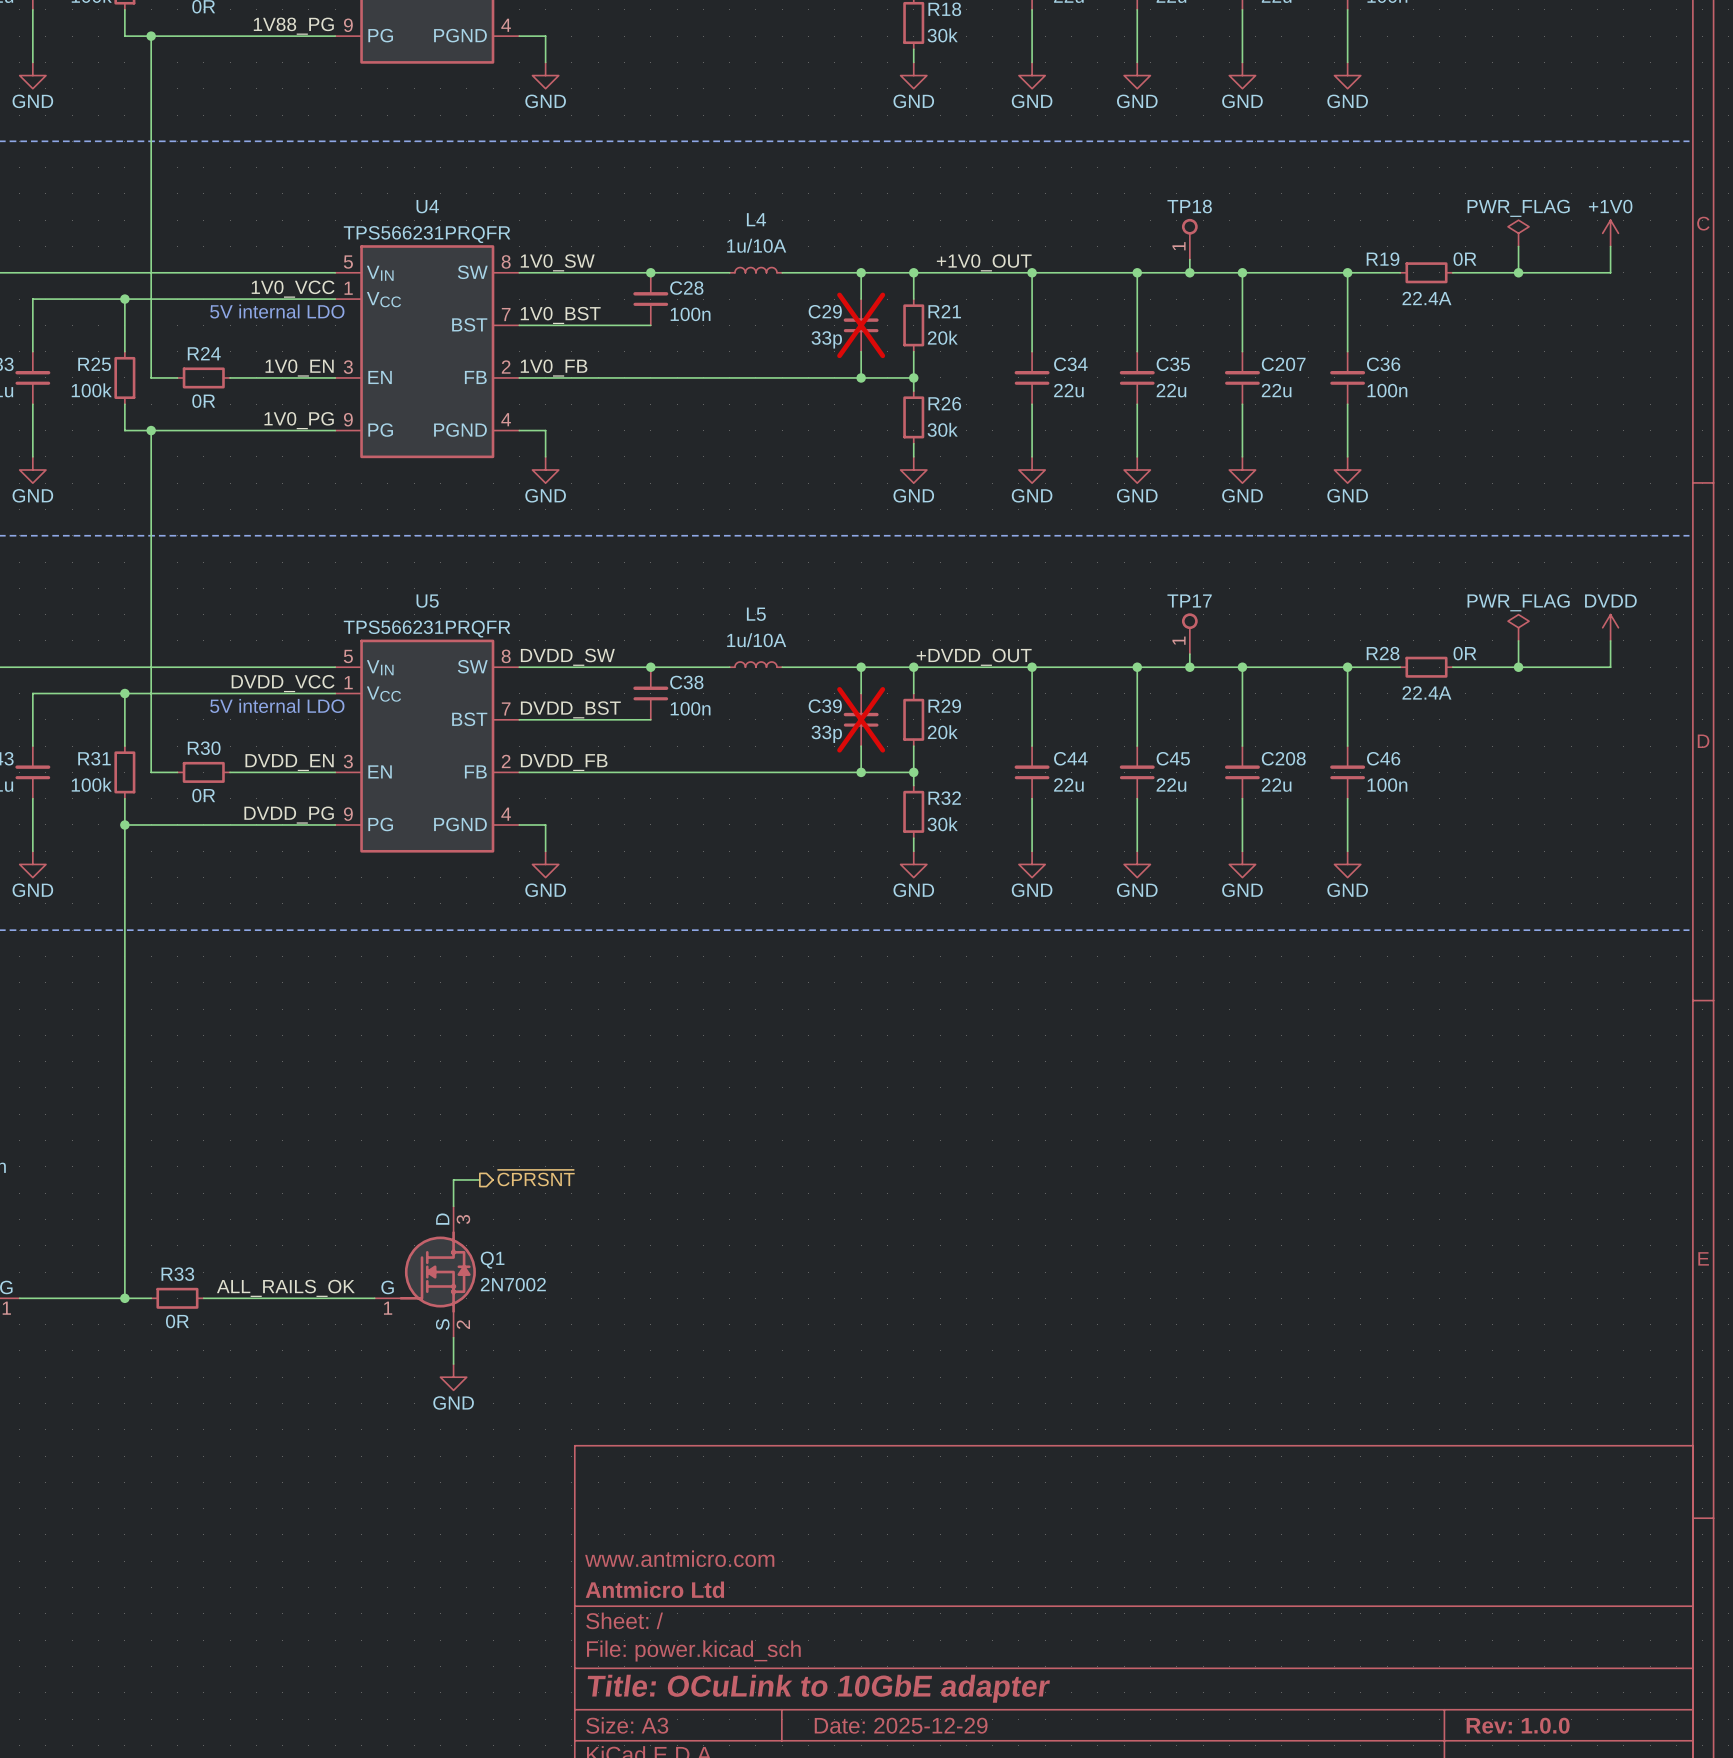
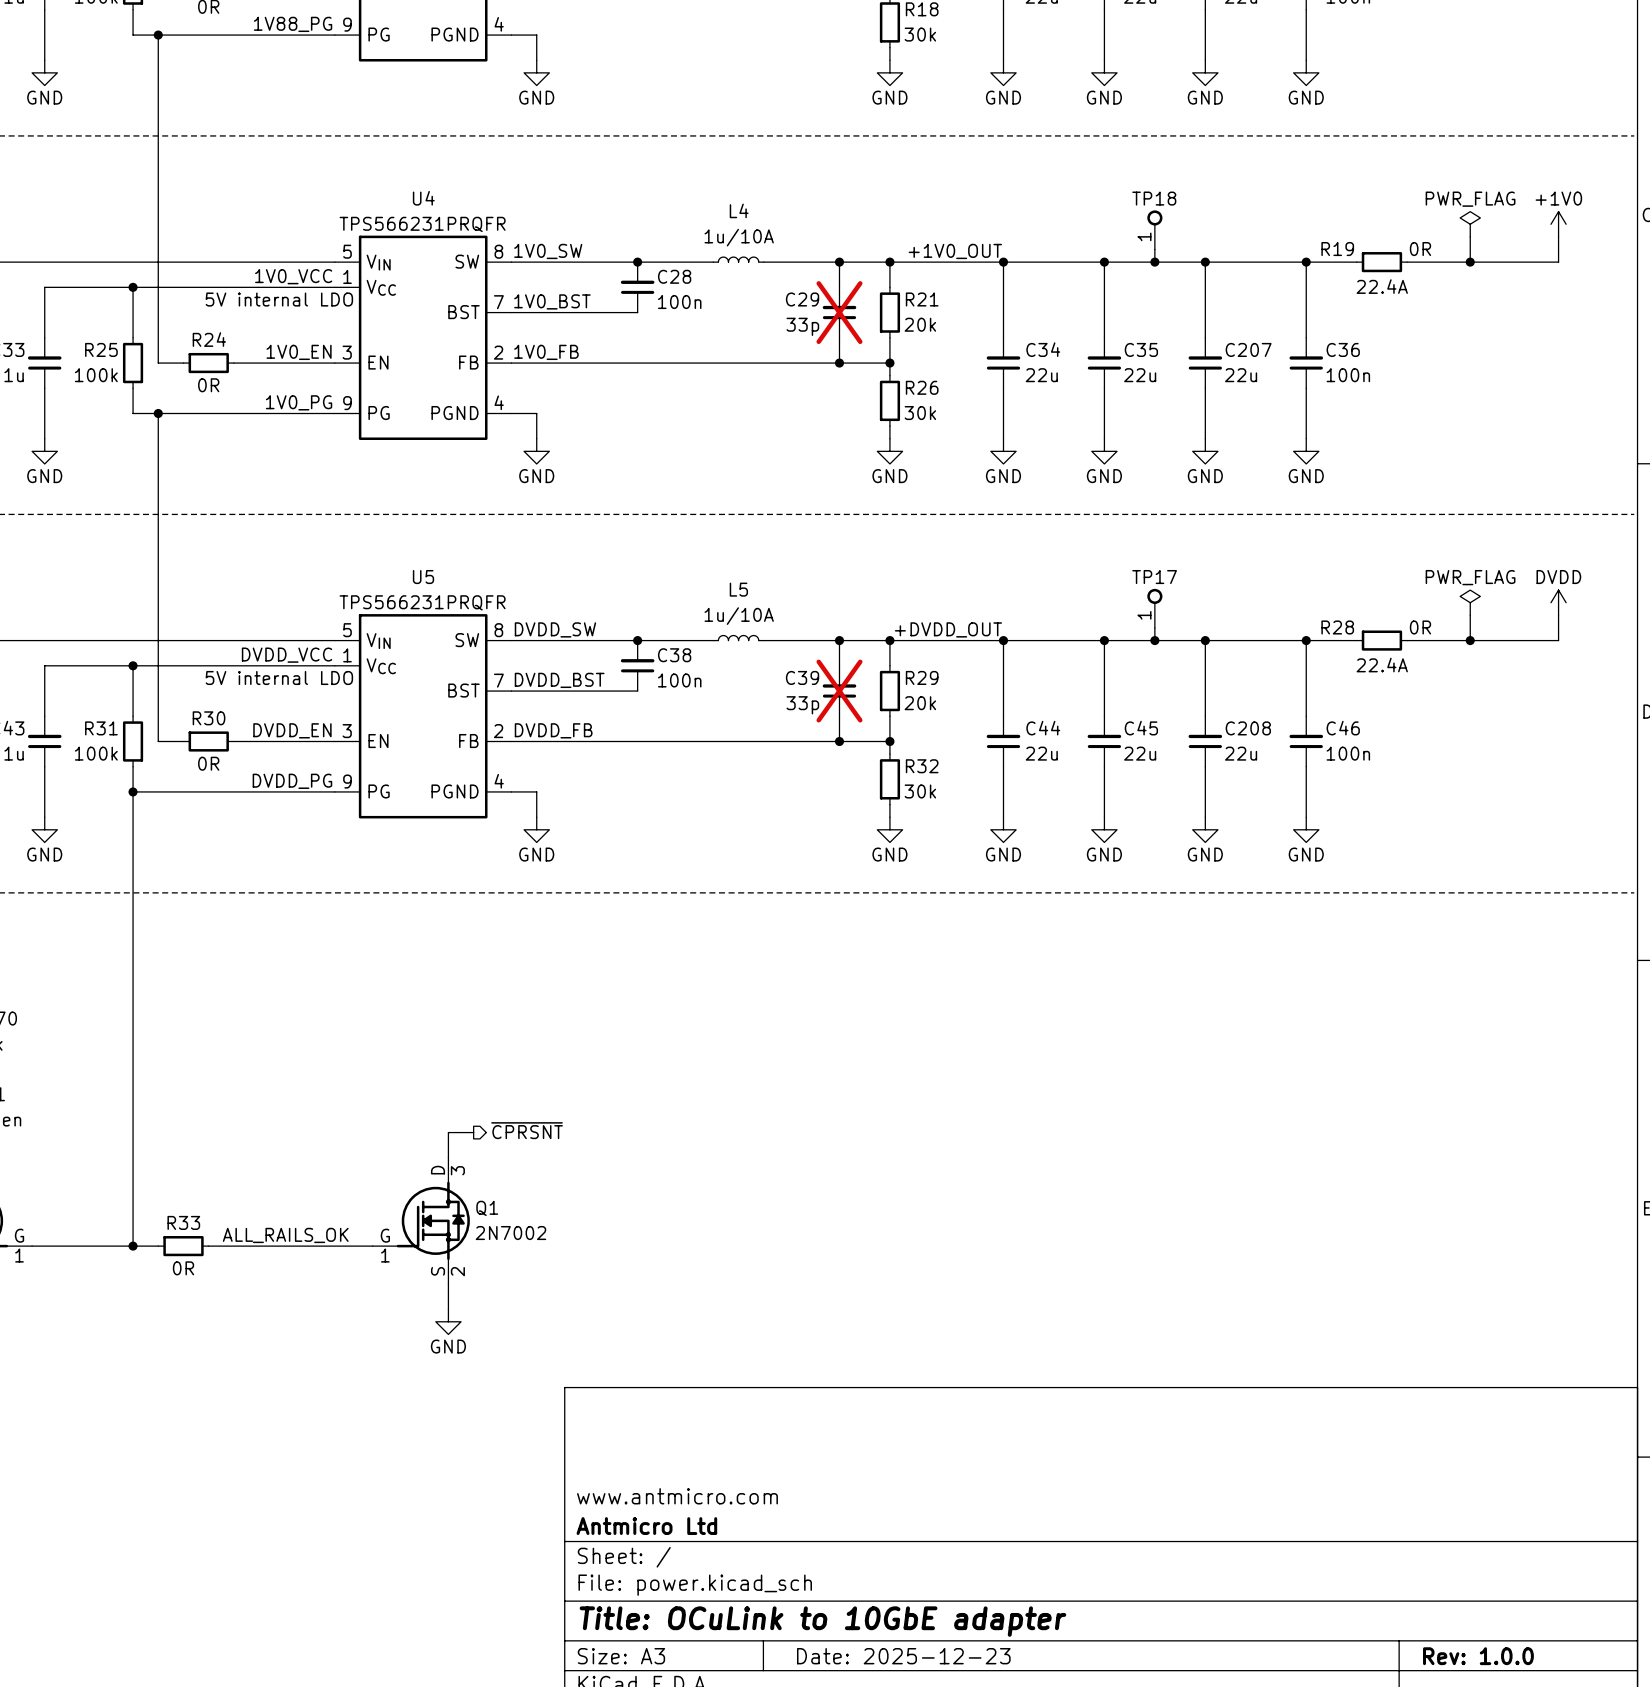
title block: Date: 2025-12-29 (901, 1725) -> Date: 2025-12-23 (903, 1656)

